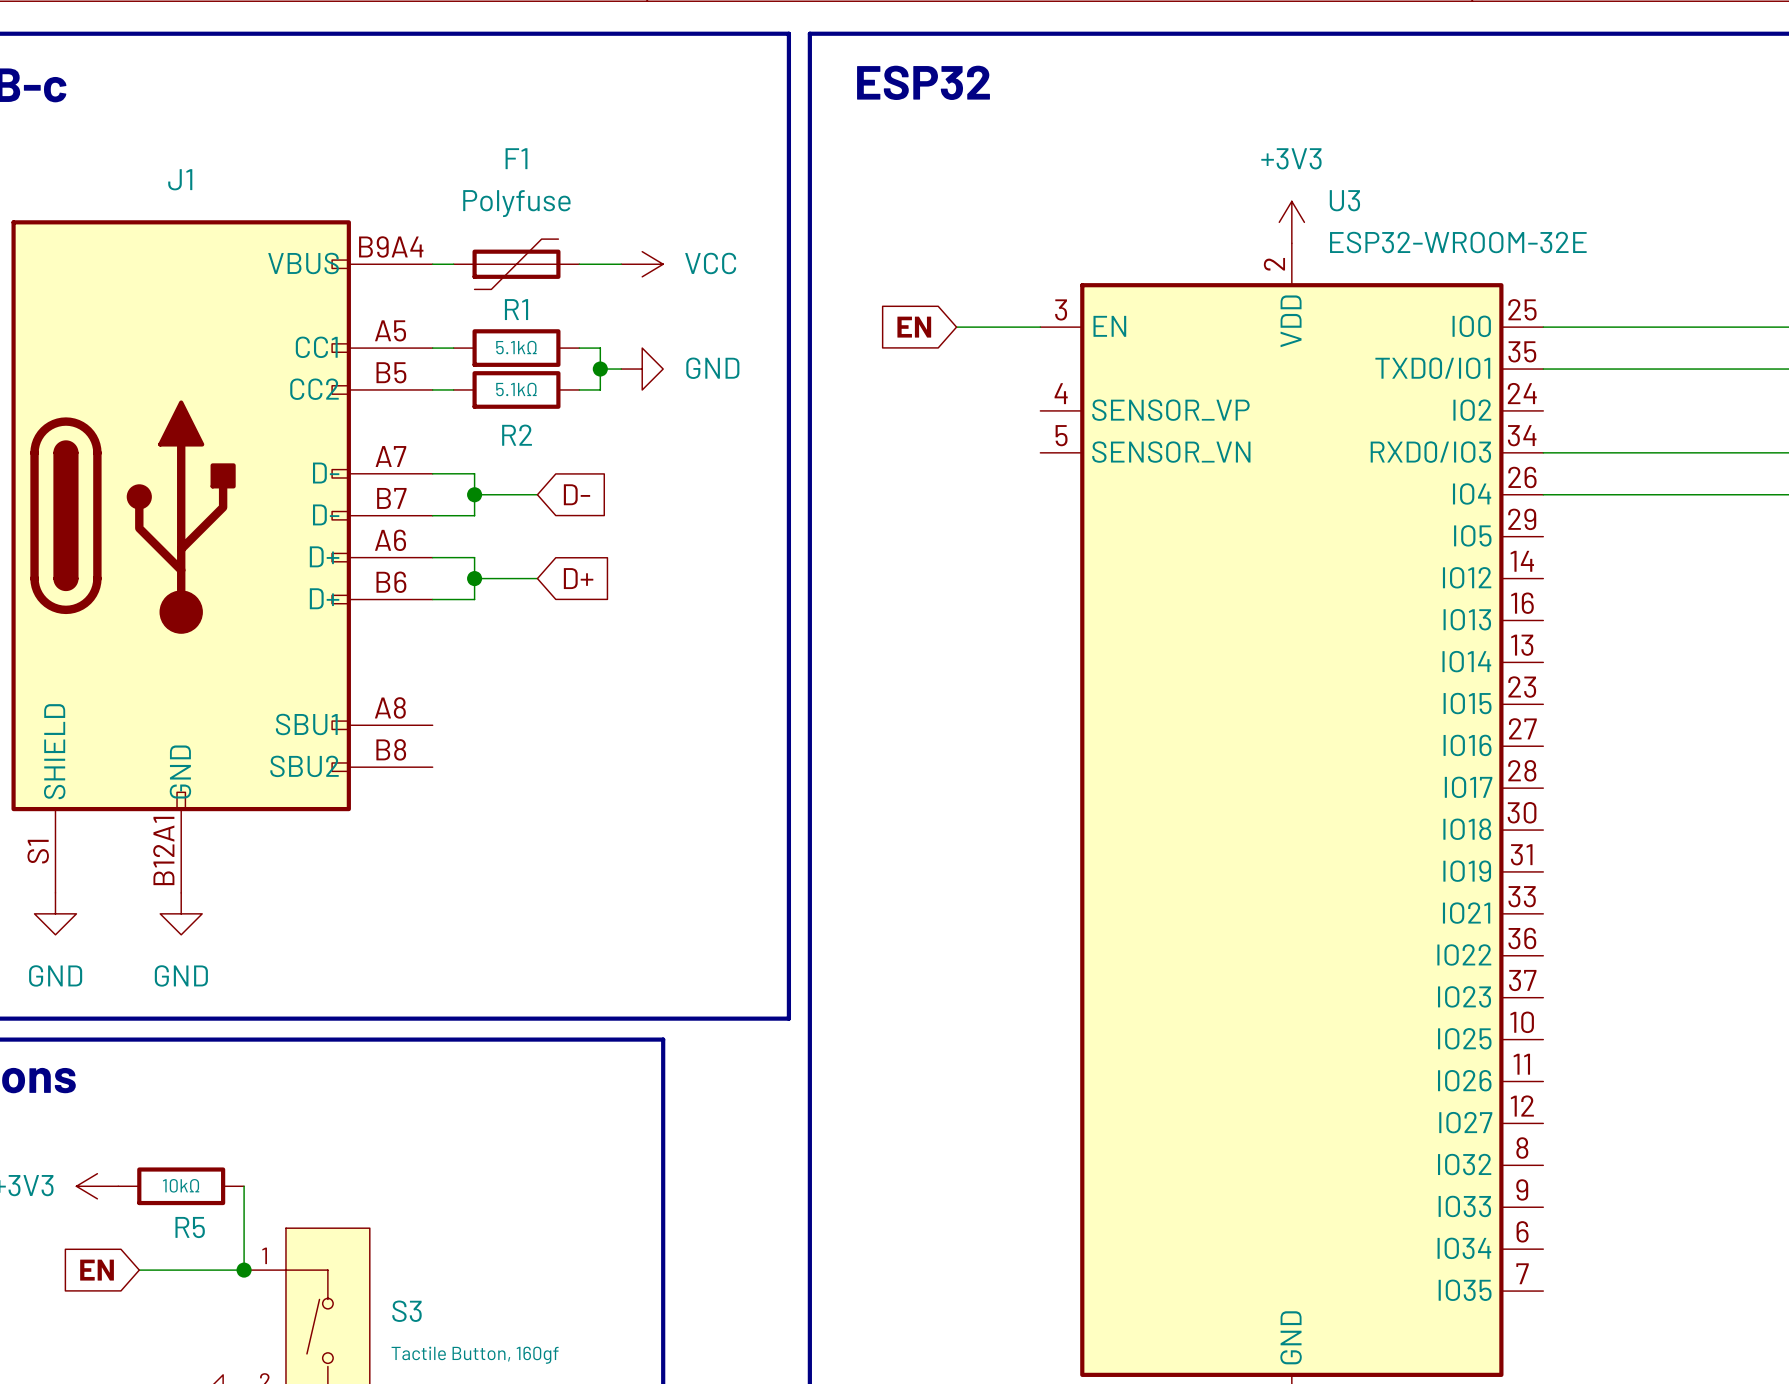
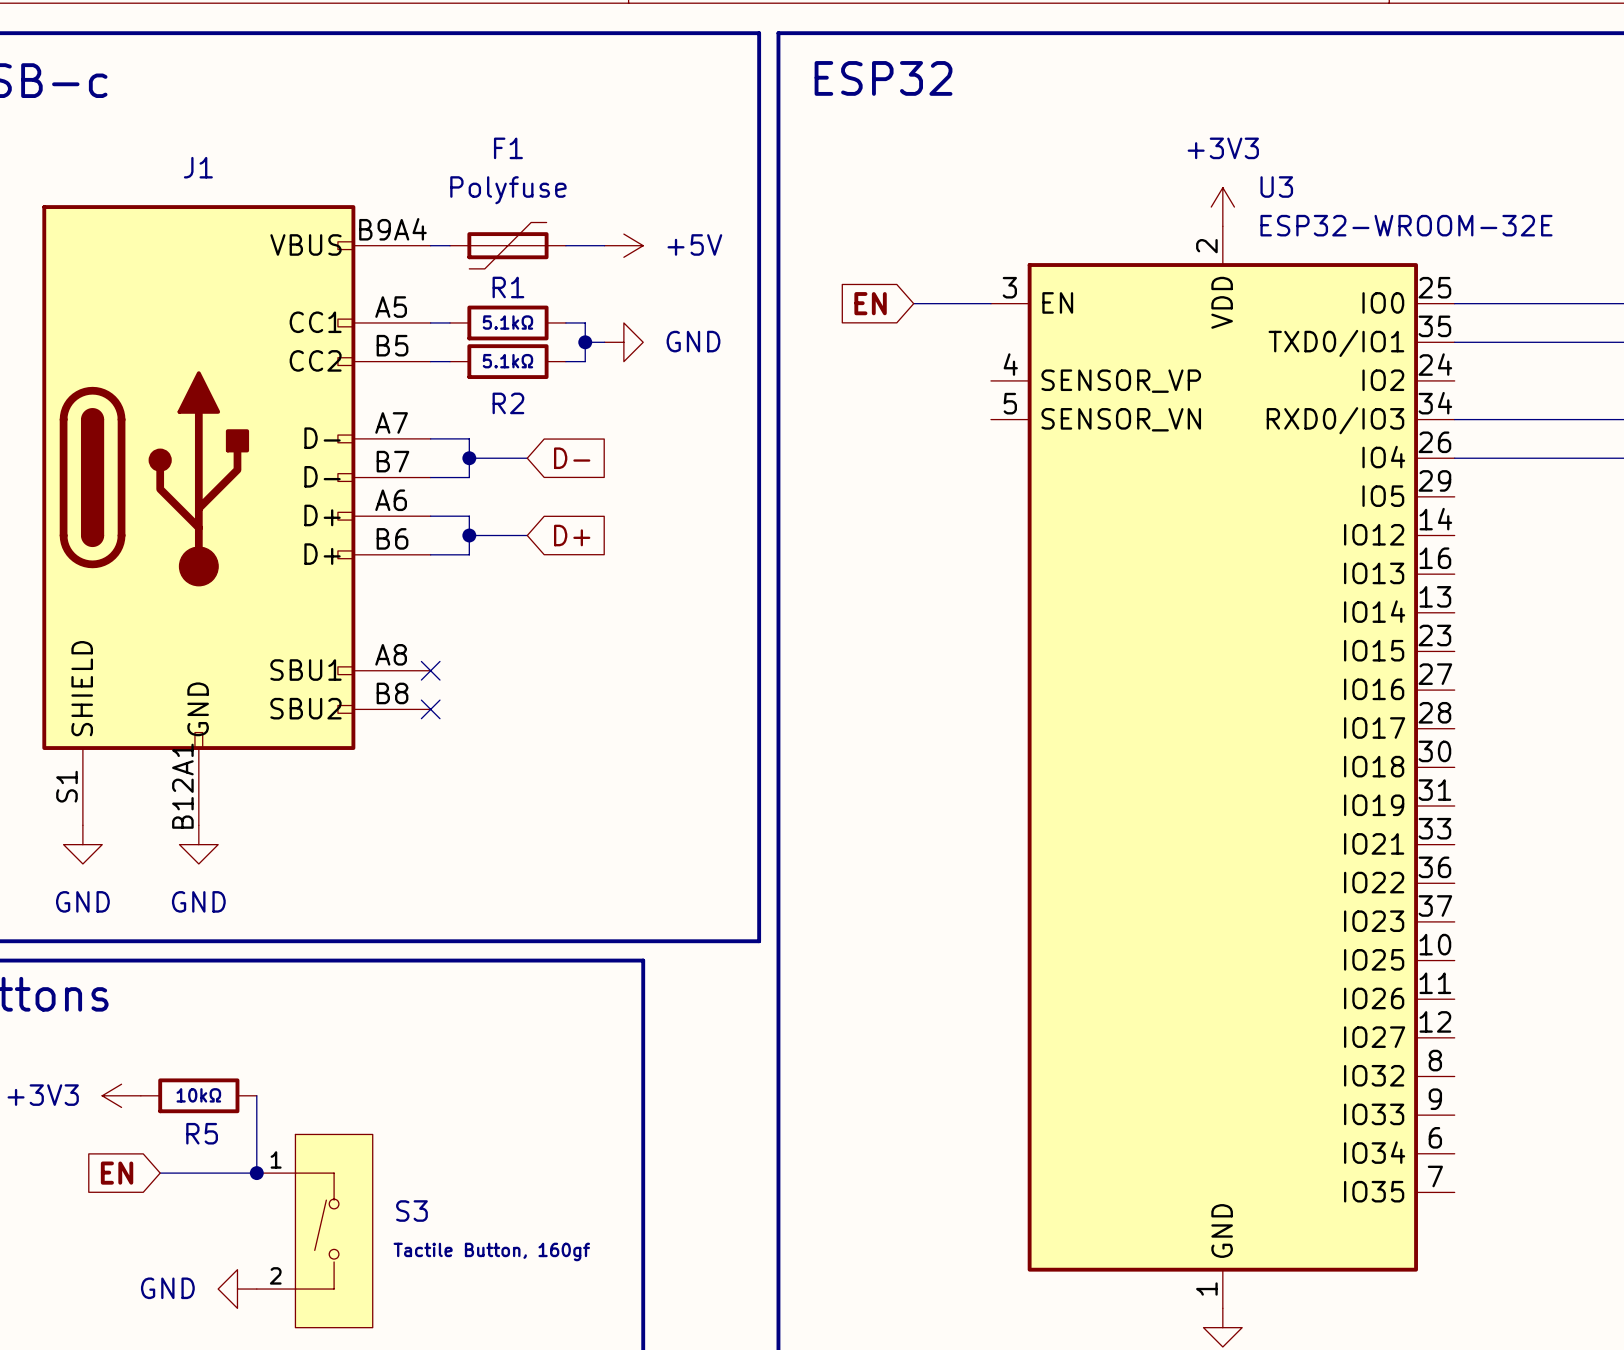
power symbol: VCC (642, 264) -> +5V (623, 245)
no-connect mark: none -> (430, 670)
no-connect mark: none -> (430, 709)

